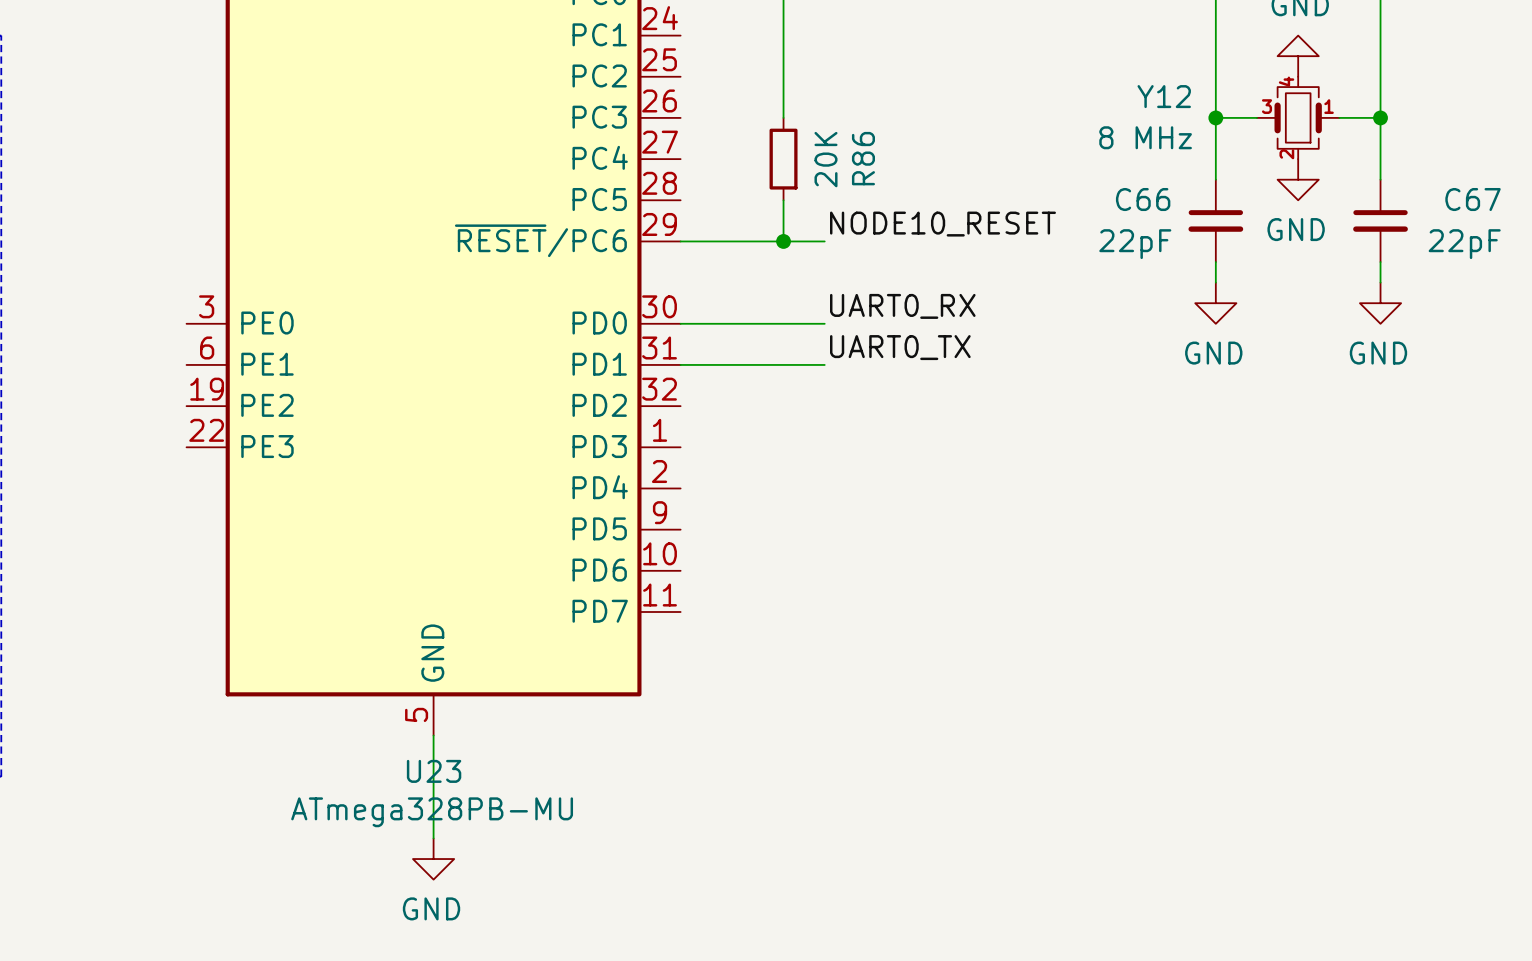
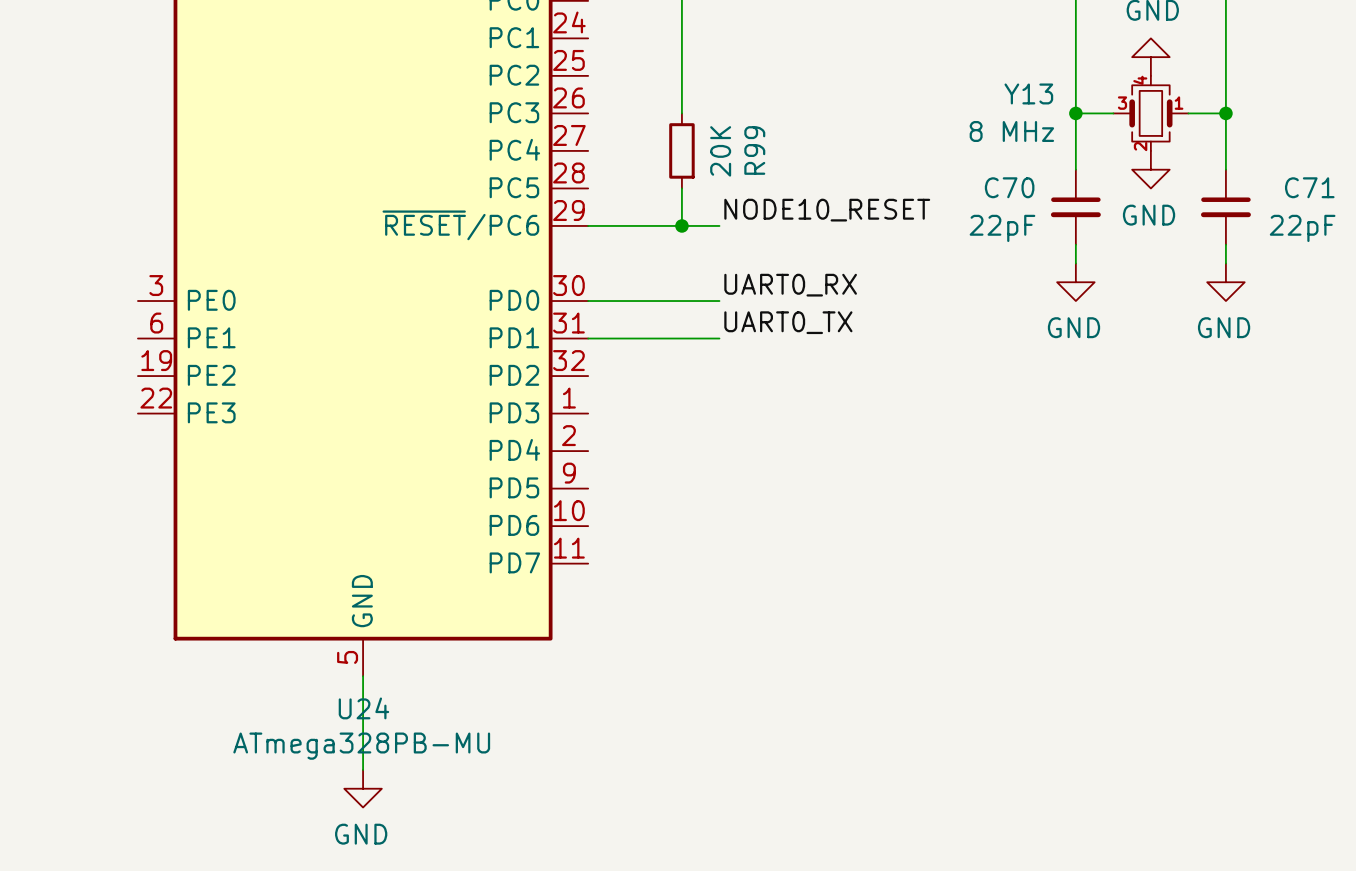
Y12 name: Y12 (1164, 96) -> Y13 (1028, 93)
R86 name: R86 (863, 158) -> R99 (754, 150)
C66 name: C66 (1143, 199) -> C70 (1009, 187)
C67 name: C67 (1473, 199) -> C71 (1309, 187)
U23 name: U23 (434, 771) -> U24 (363, 708)

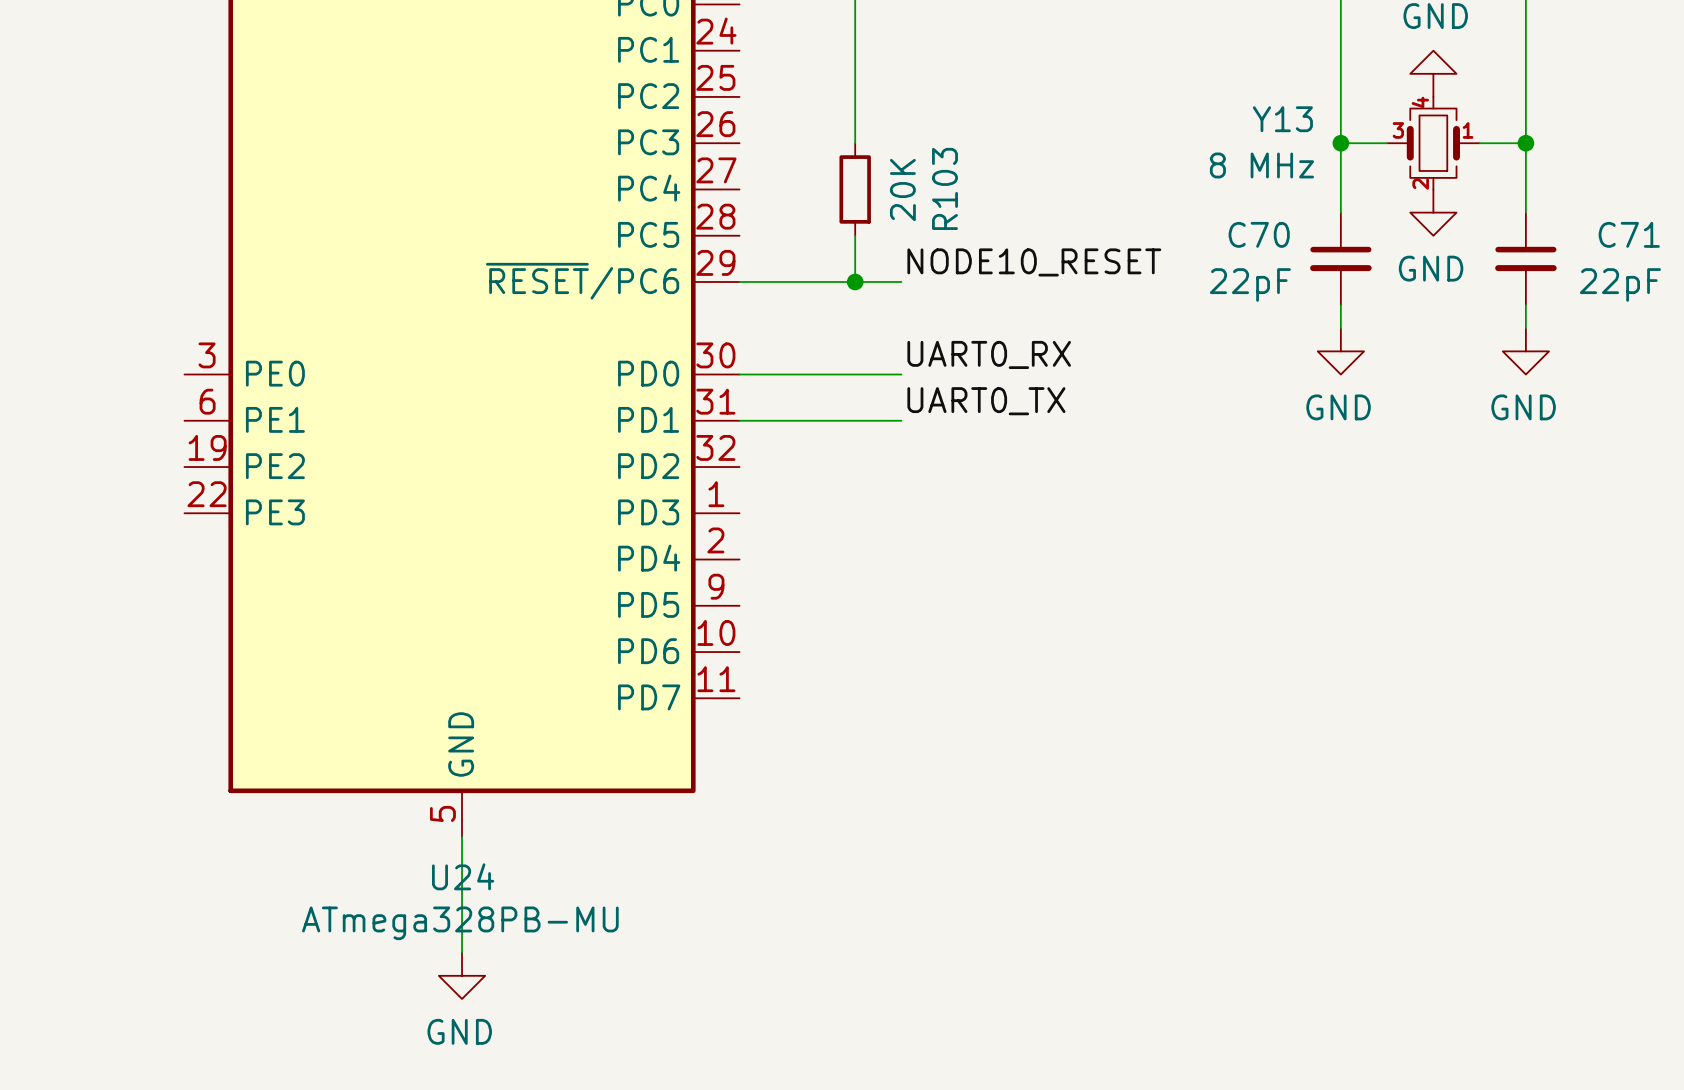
R99 name: R99 (754, 150) -> R103 (944, 188)

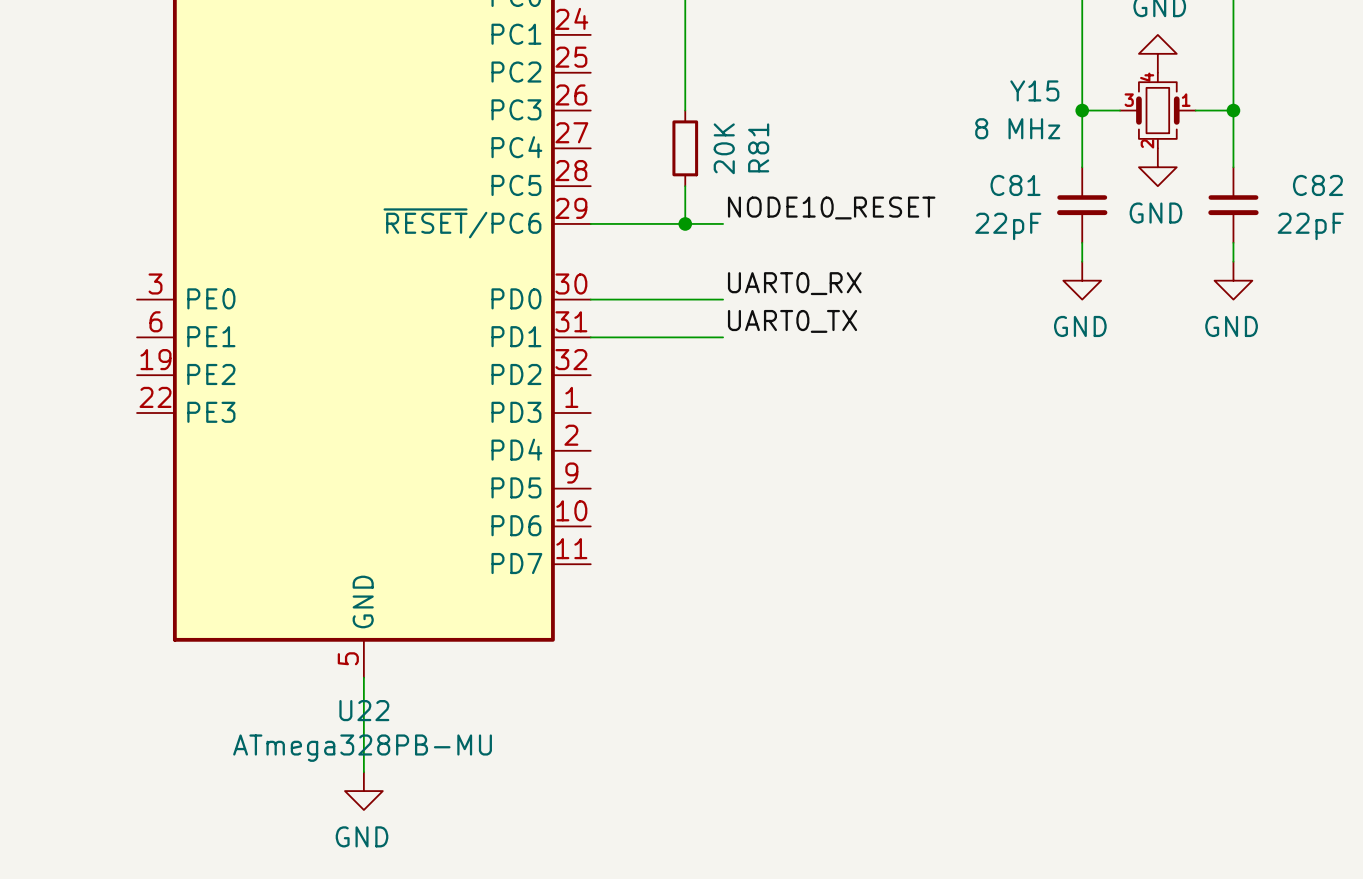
Y13 name: Y13 (1282, 119) -> Y15 (1034, 90)
R103 name: R103 (944, 188) -> R81 (758, 147)
C70 name: C70 (1259, 234) -> C81 (1015, 185)
C71 name: C71 (1629, 234) -> C82 (1317, 185)
U24 name: U24 (463, 876) -> U22 (364, 710)

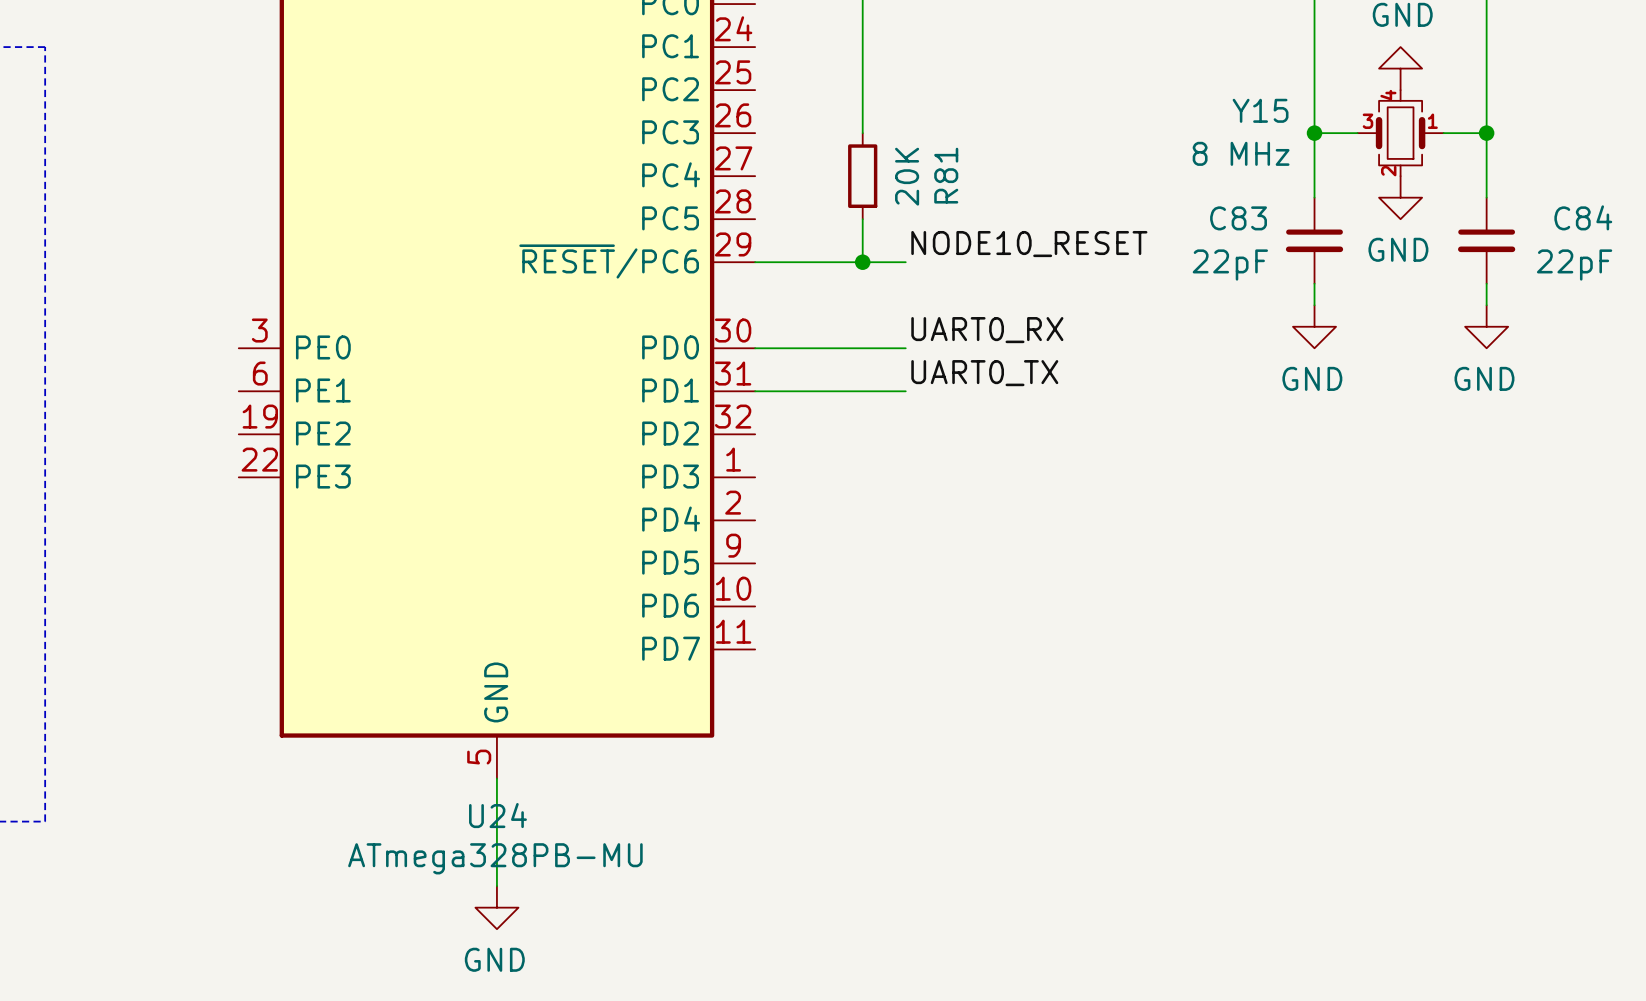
C81 name: C81 (1015, 185) -> C83 (1238, 218)
C82 name: C82 (1317, 185) -> C84 (1583, 217)
U22 name: U22 (364, 710) -> U24 (497, 815)

